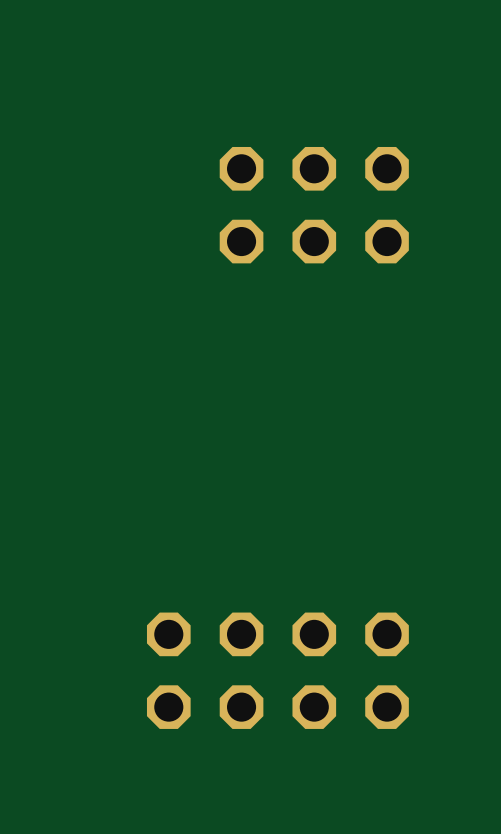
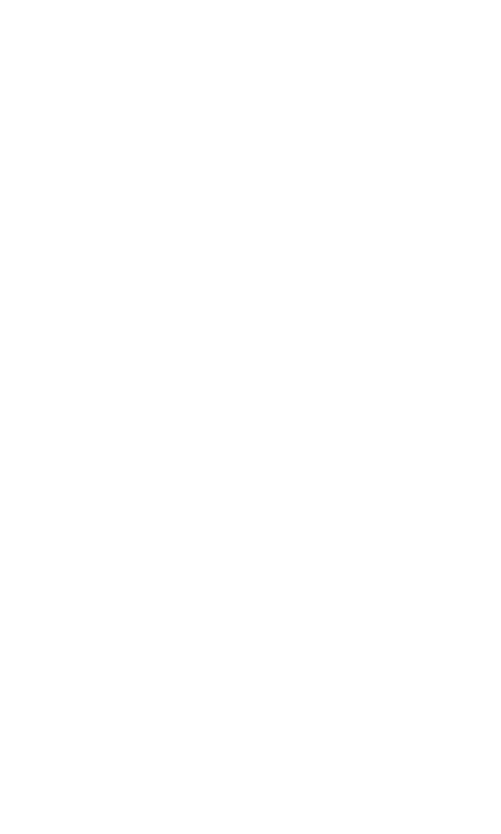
part: (314, 205) -> none
part: (277, 670) -> none

